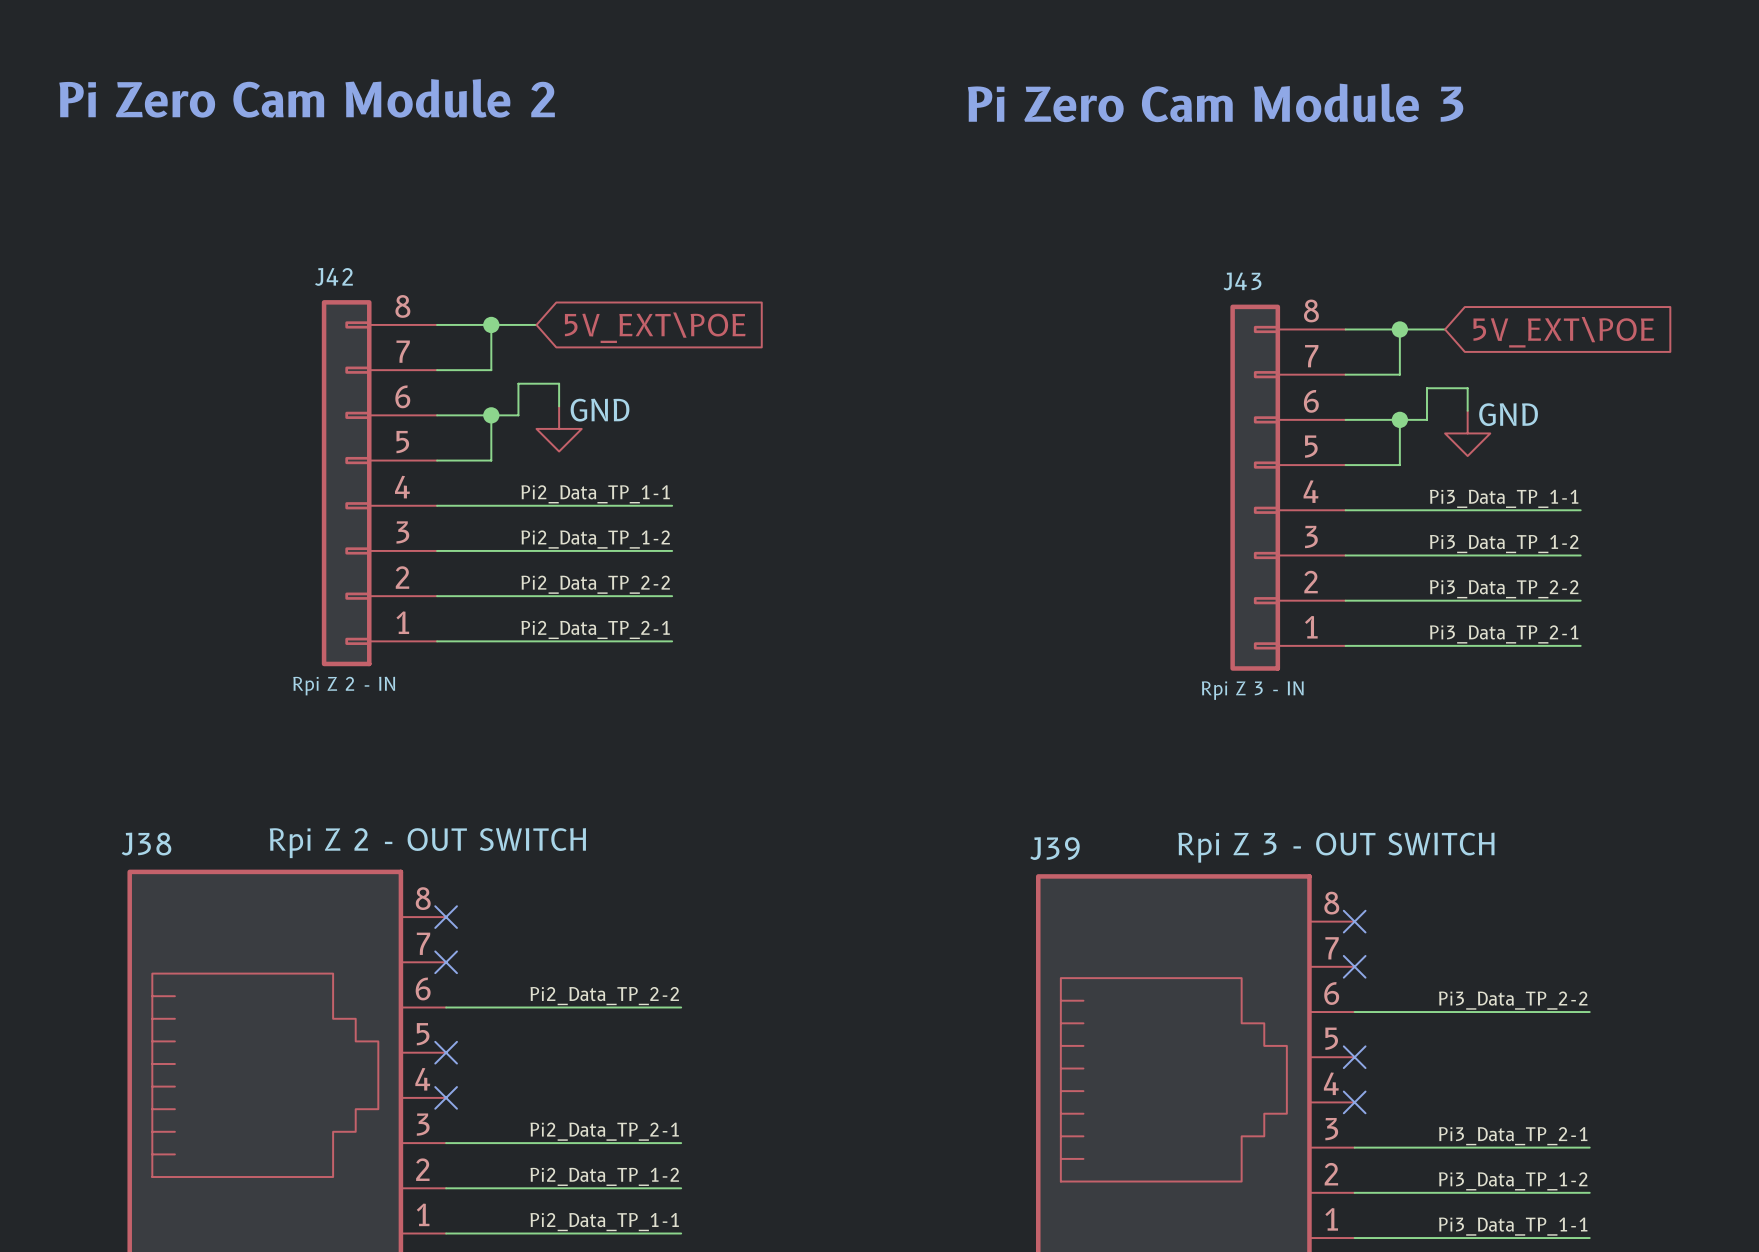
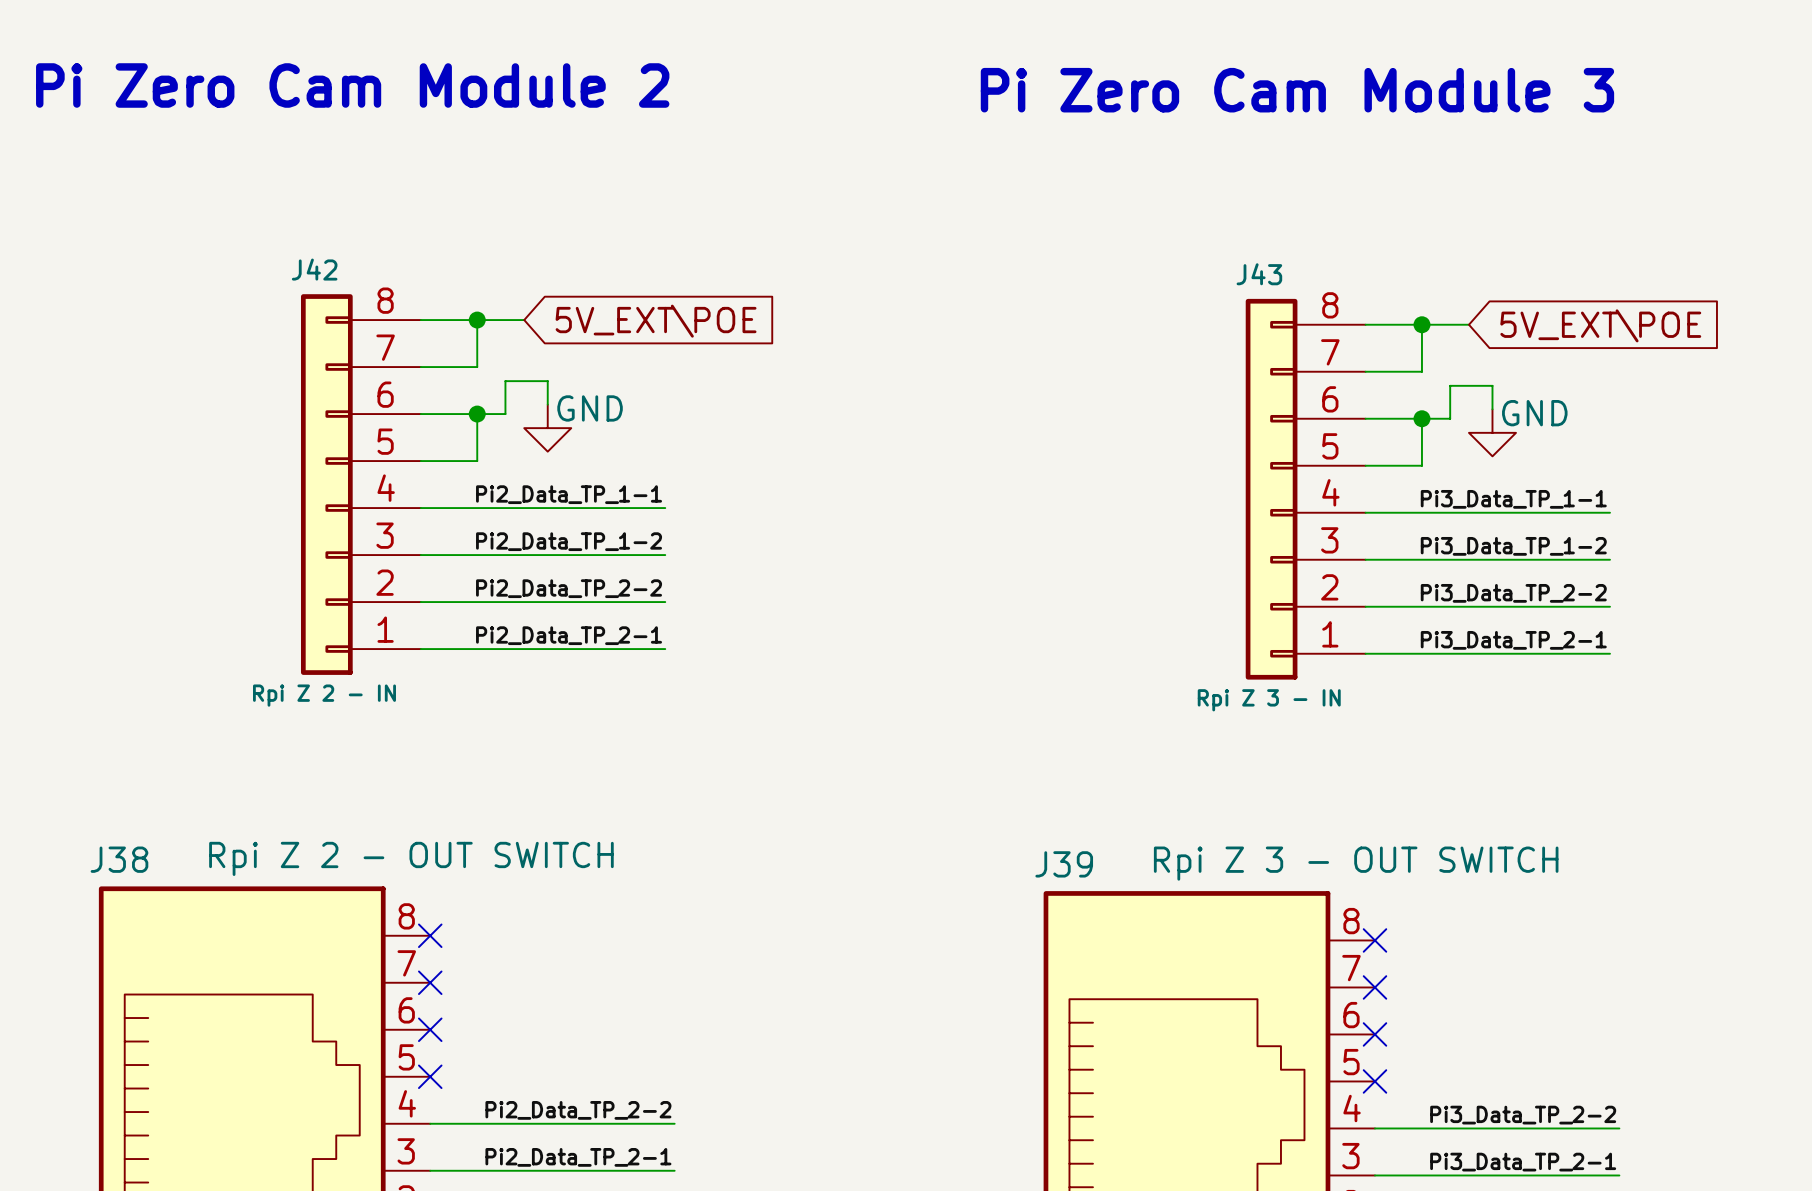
label position: Pi2_Data_TP_2-2 (604, 996) -> Pi2_Data_TP_2-2 (578, 1110)
label position: Pi3_Data_TP_2-2 (1513, 1000) -> Pi3_Data_TP_2-2 (1523, 1115)
wire: (446, 1007) (681, 1007) -> (430, 1123) (674, 1123)
wire: (1354, 1012) (1589, 1012) -> (1374, 1128) (1619, 1128)
no-connect mark position: (446, 1097) -> (430, 1029)
no-connect mark position: (1354, 1102) -> (1374, 1034)

